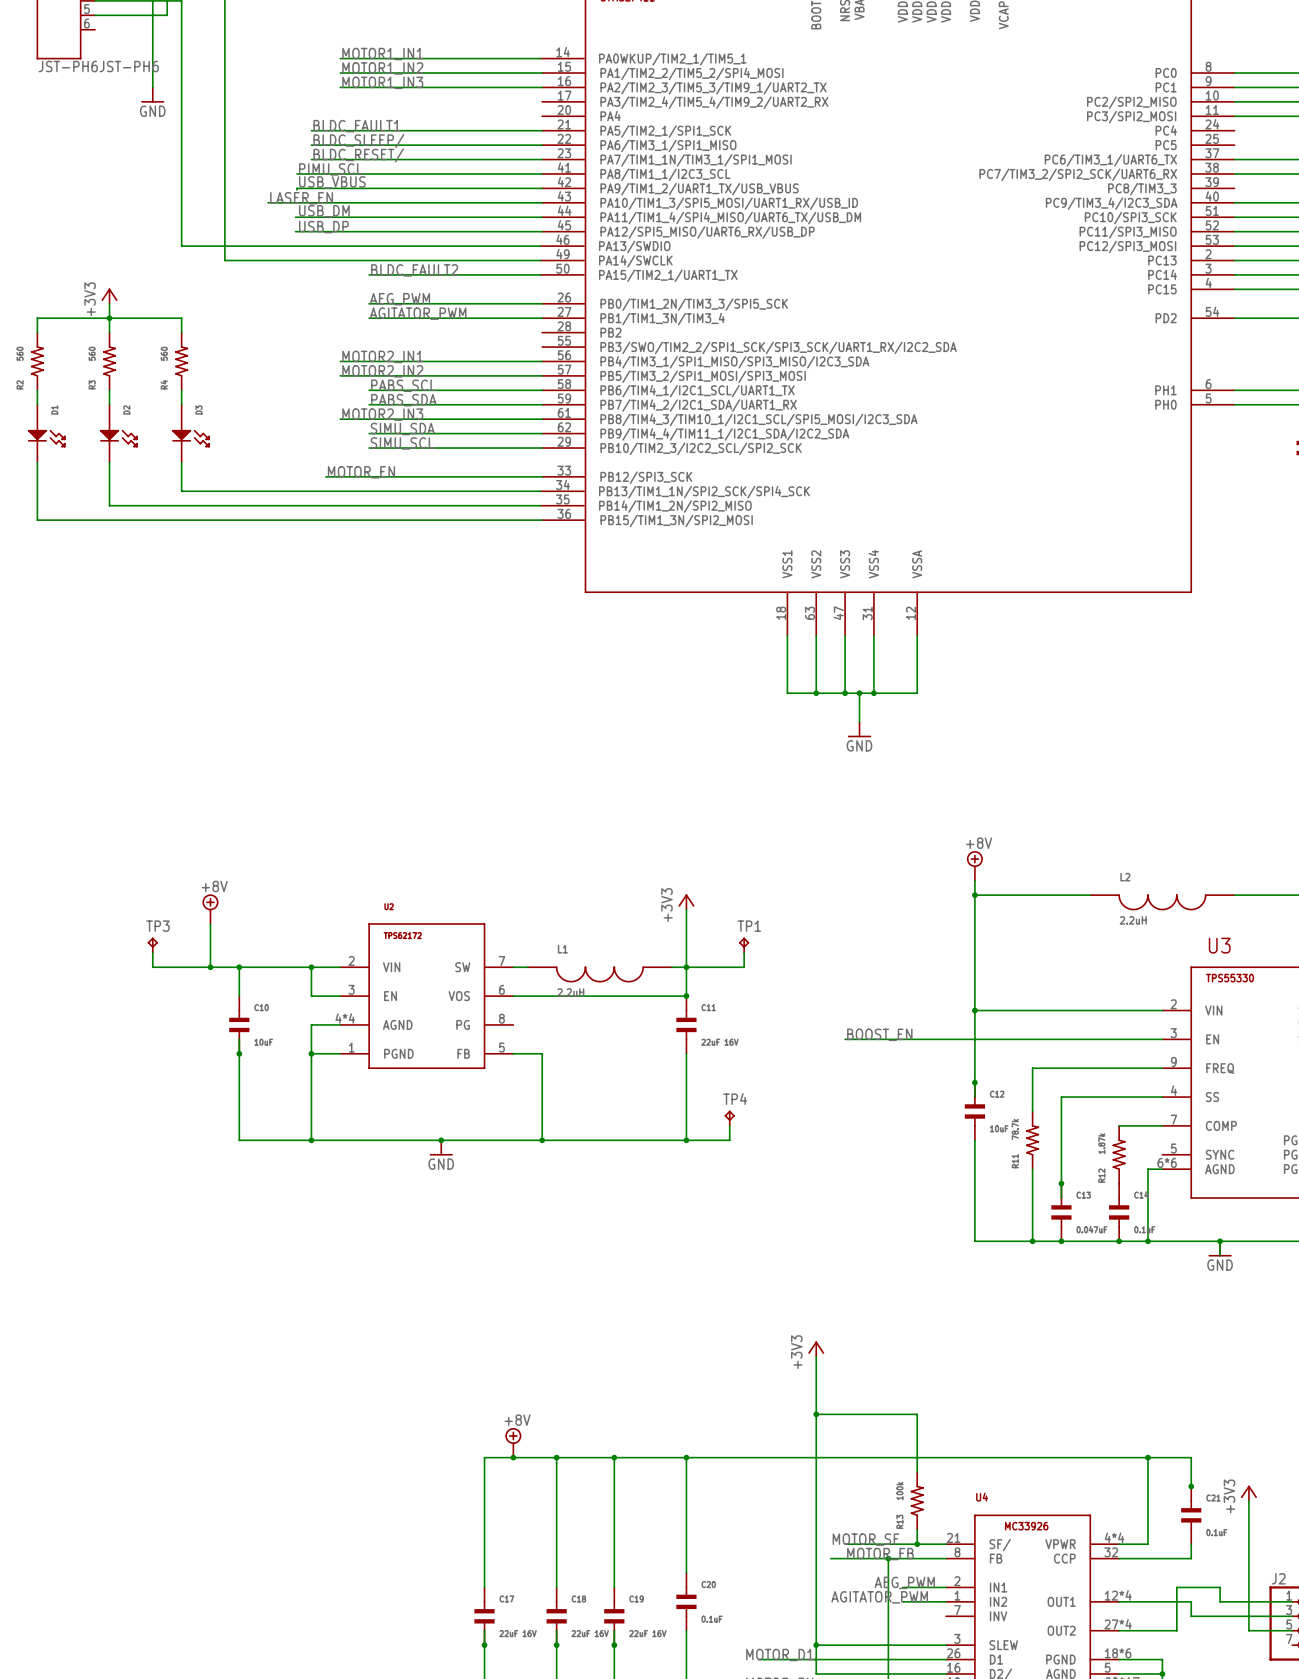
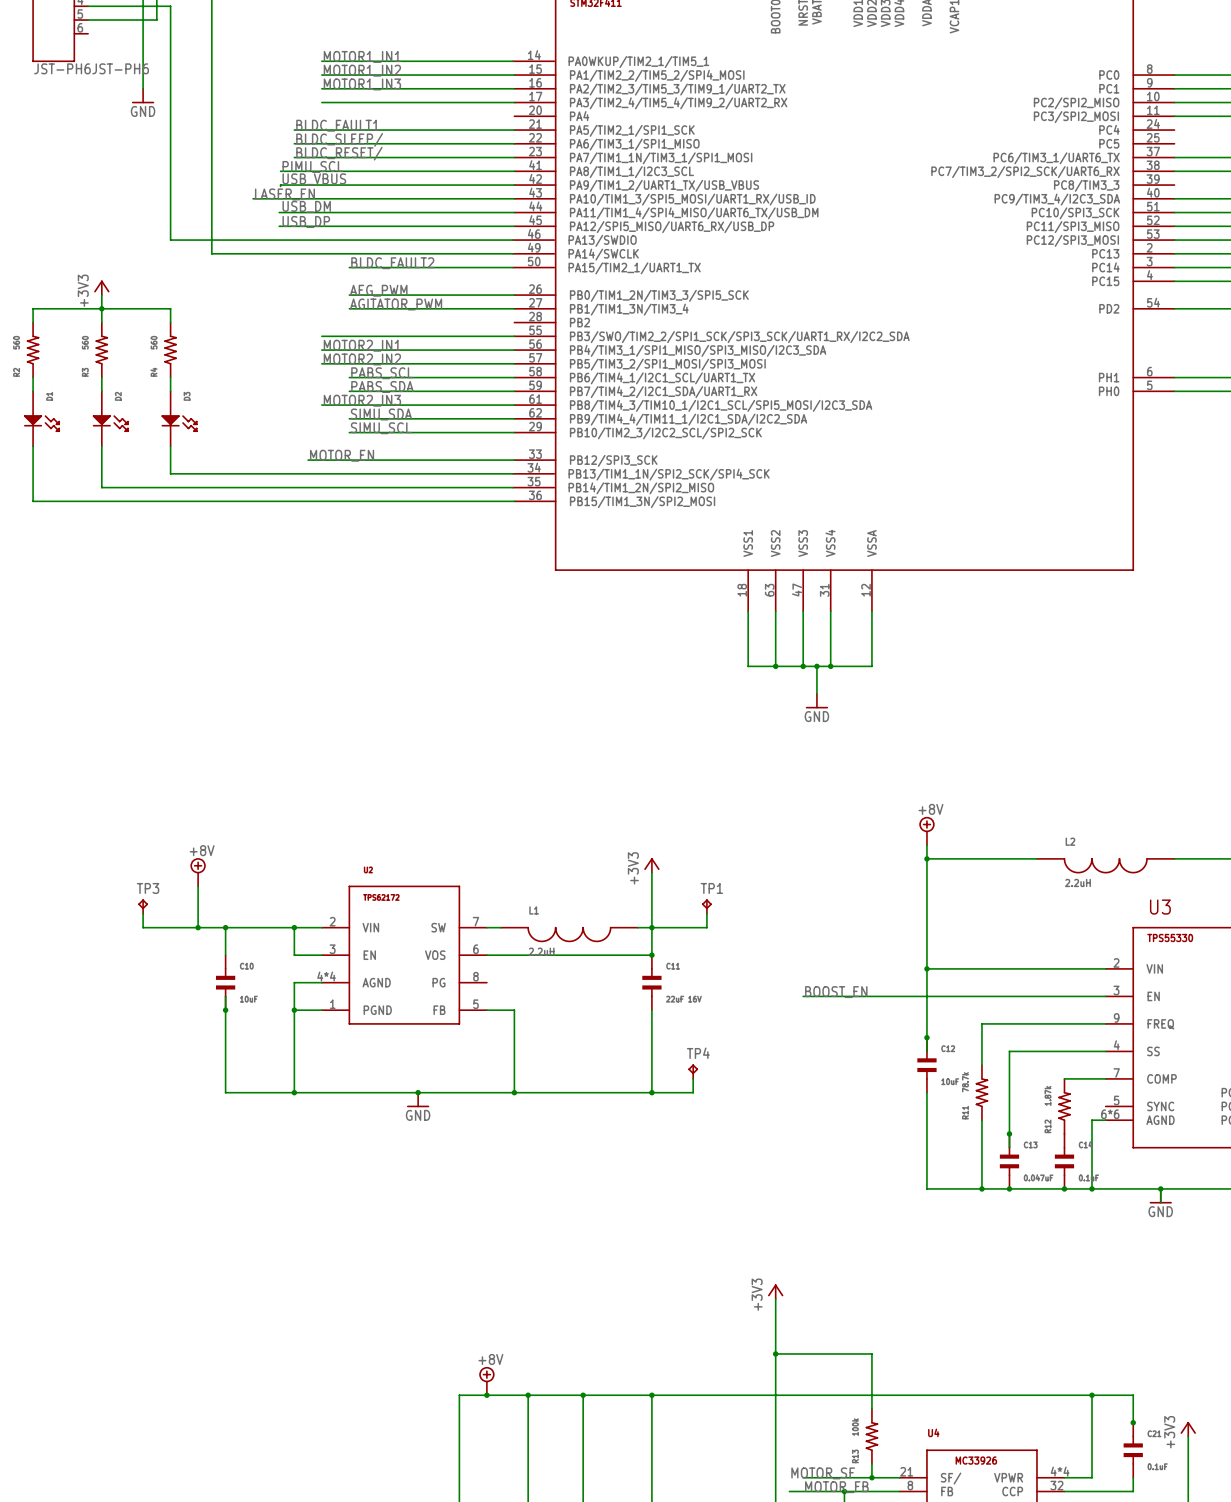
wire: none -> (321, 102) (514, 102)
wire: none -> (321, 336) (514, 336)

